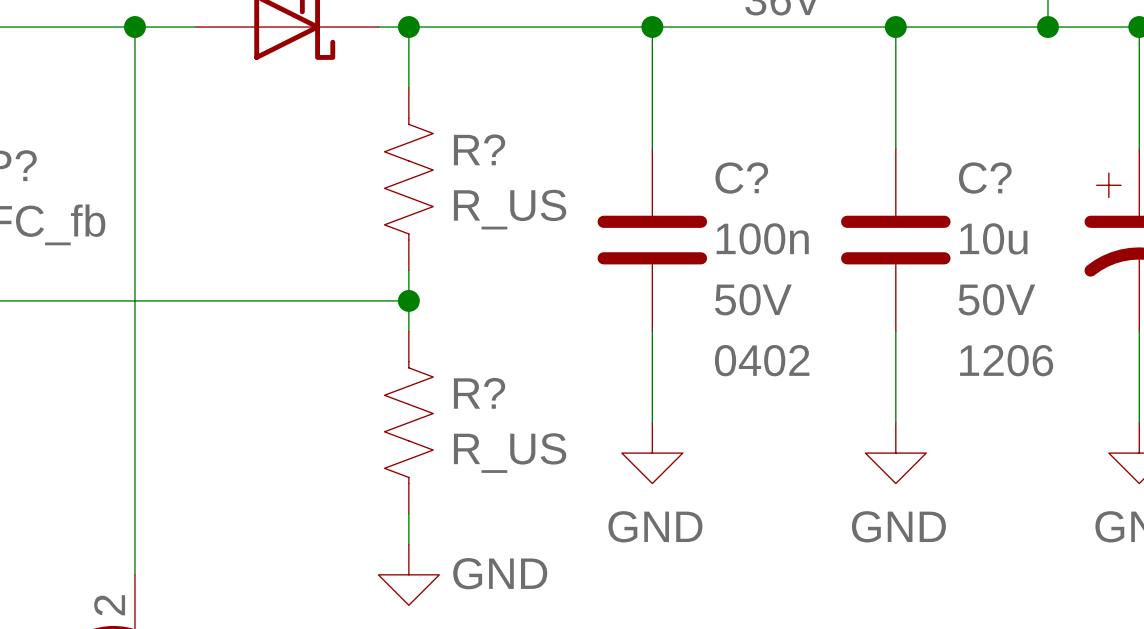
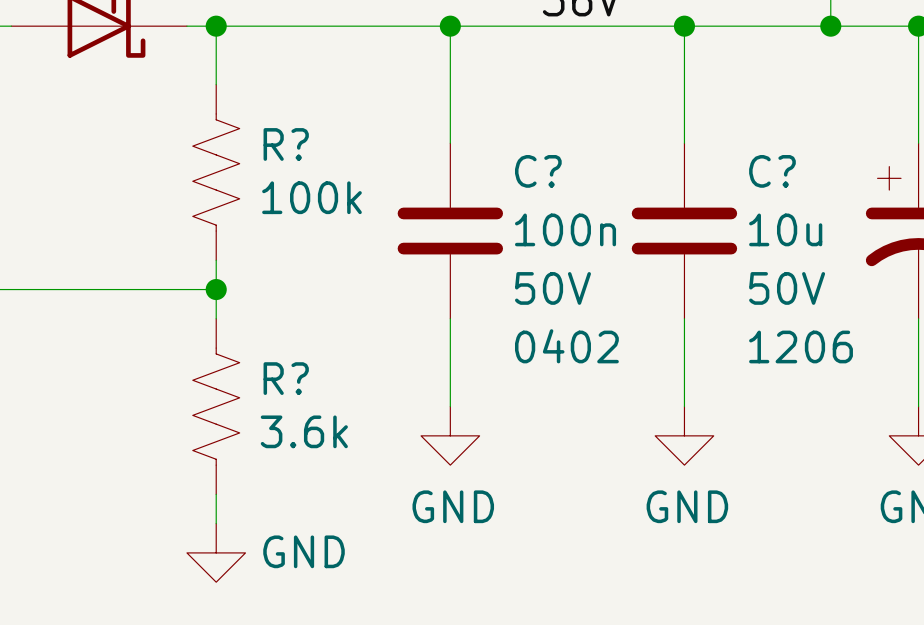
R? value: R_US (510, 209) -> 100k (311, 197)
R? value: R_US (510, 453) -> 3.6k (304, 431)

